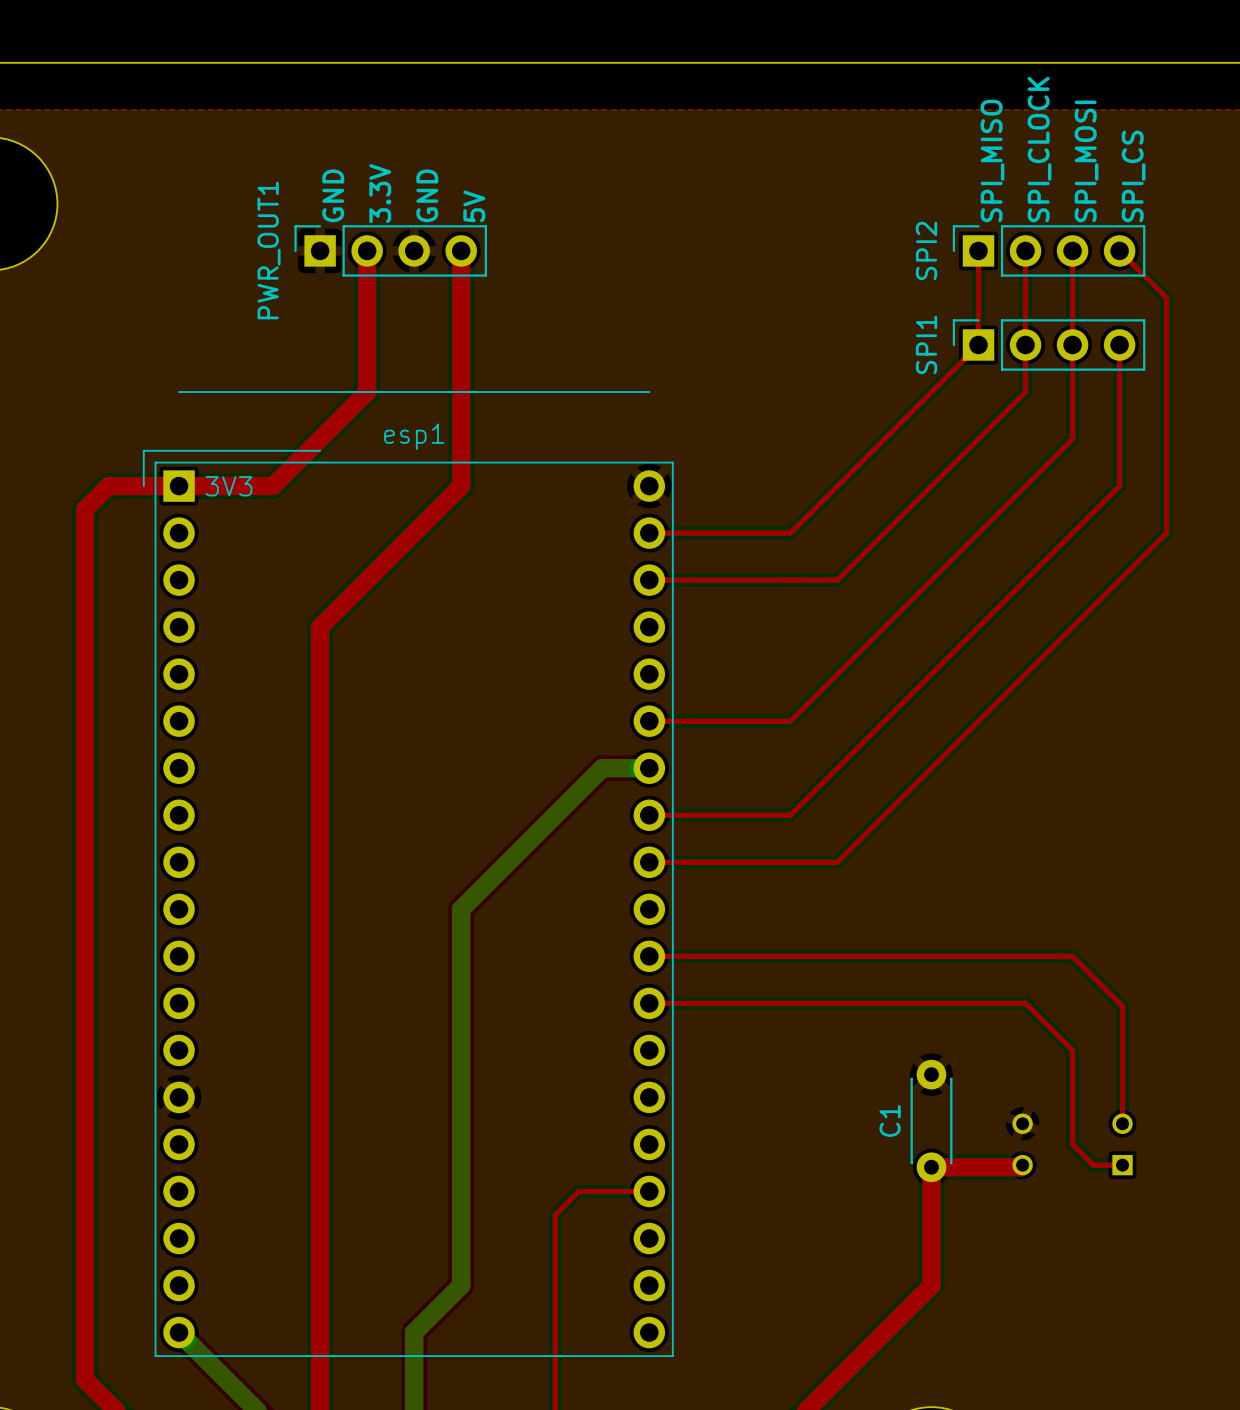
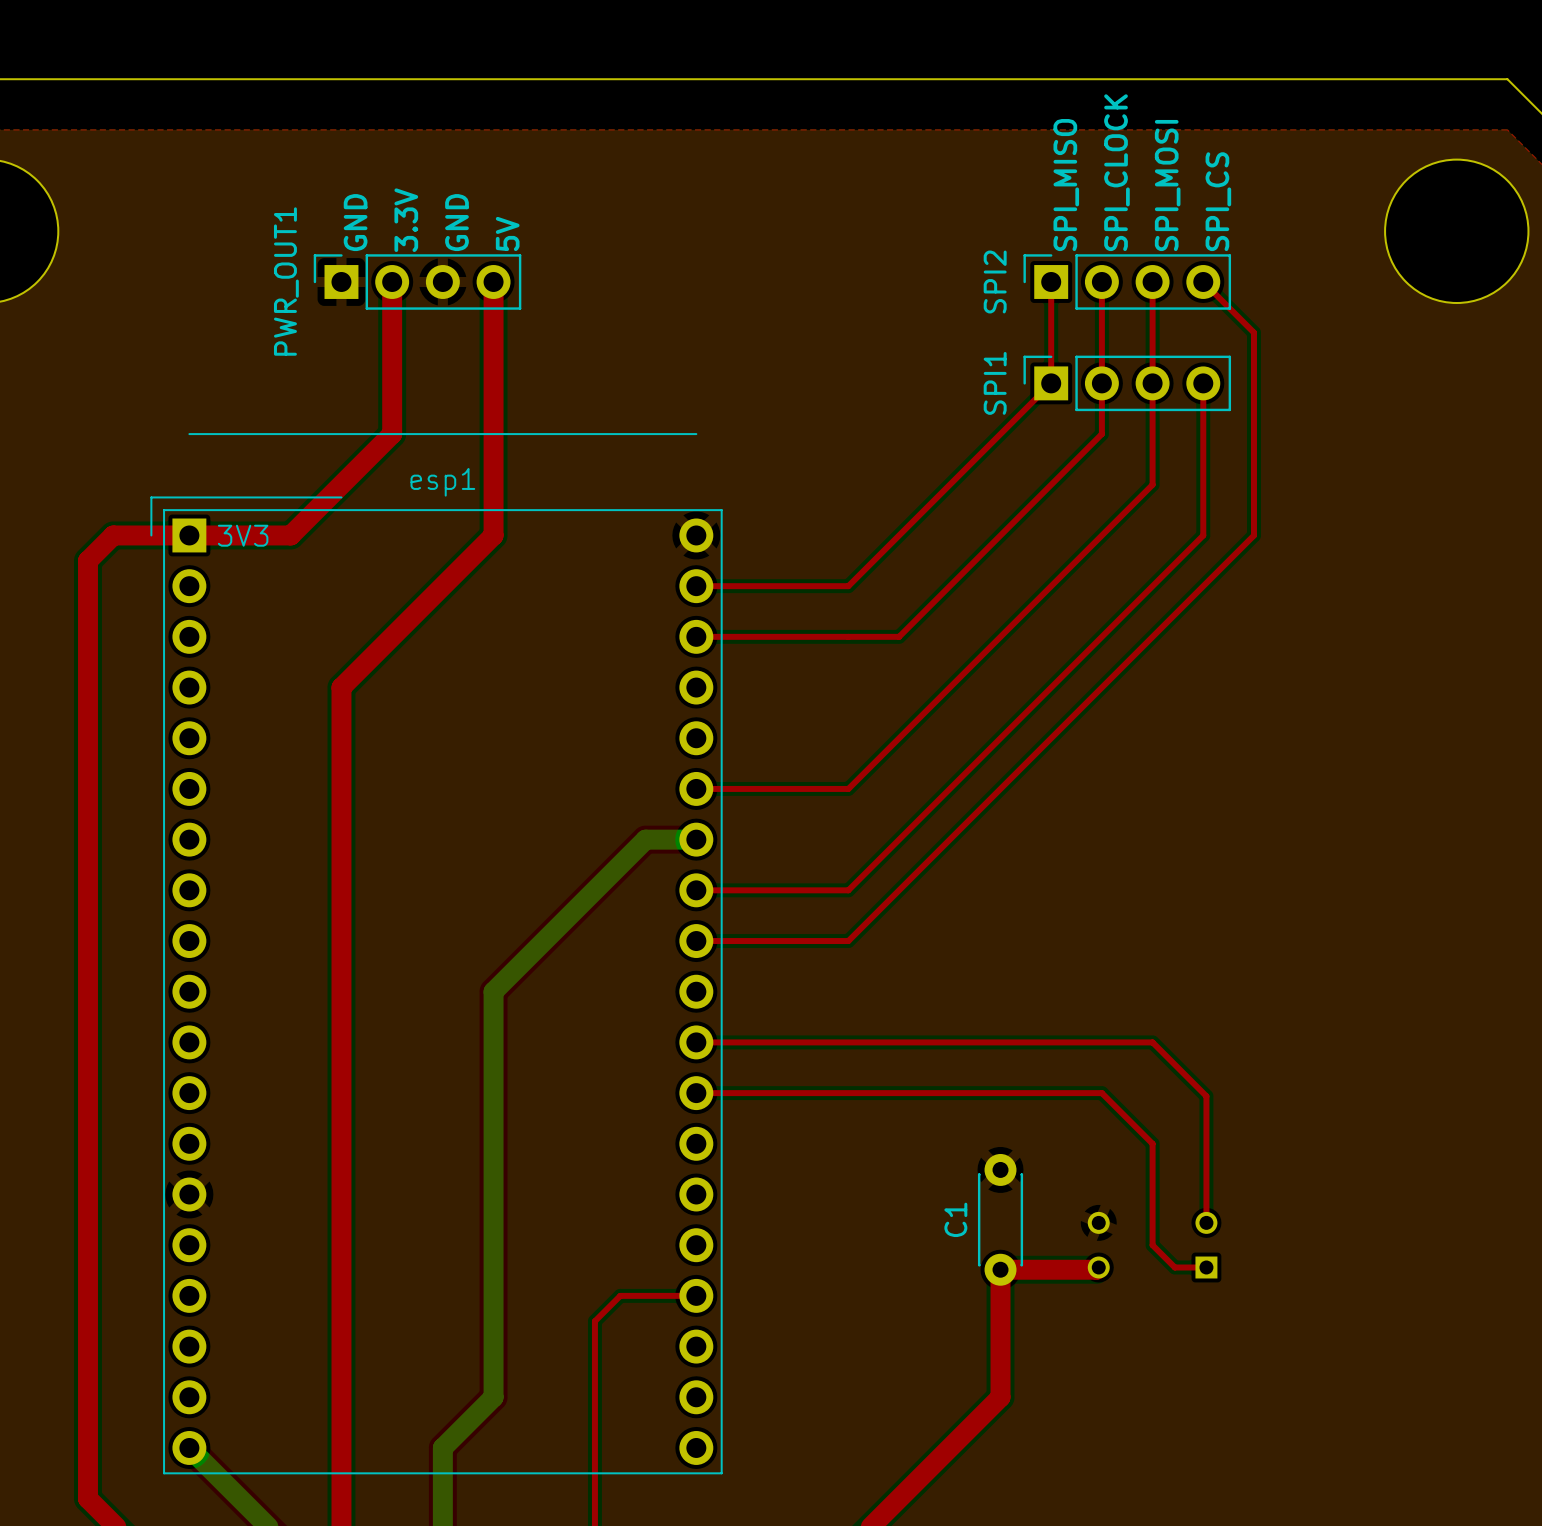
top track: (1166, 486) (1166, 533) (837, 862) (790, 862) -> (1253, 535) (848, 941)

